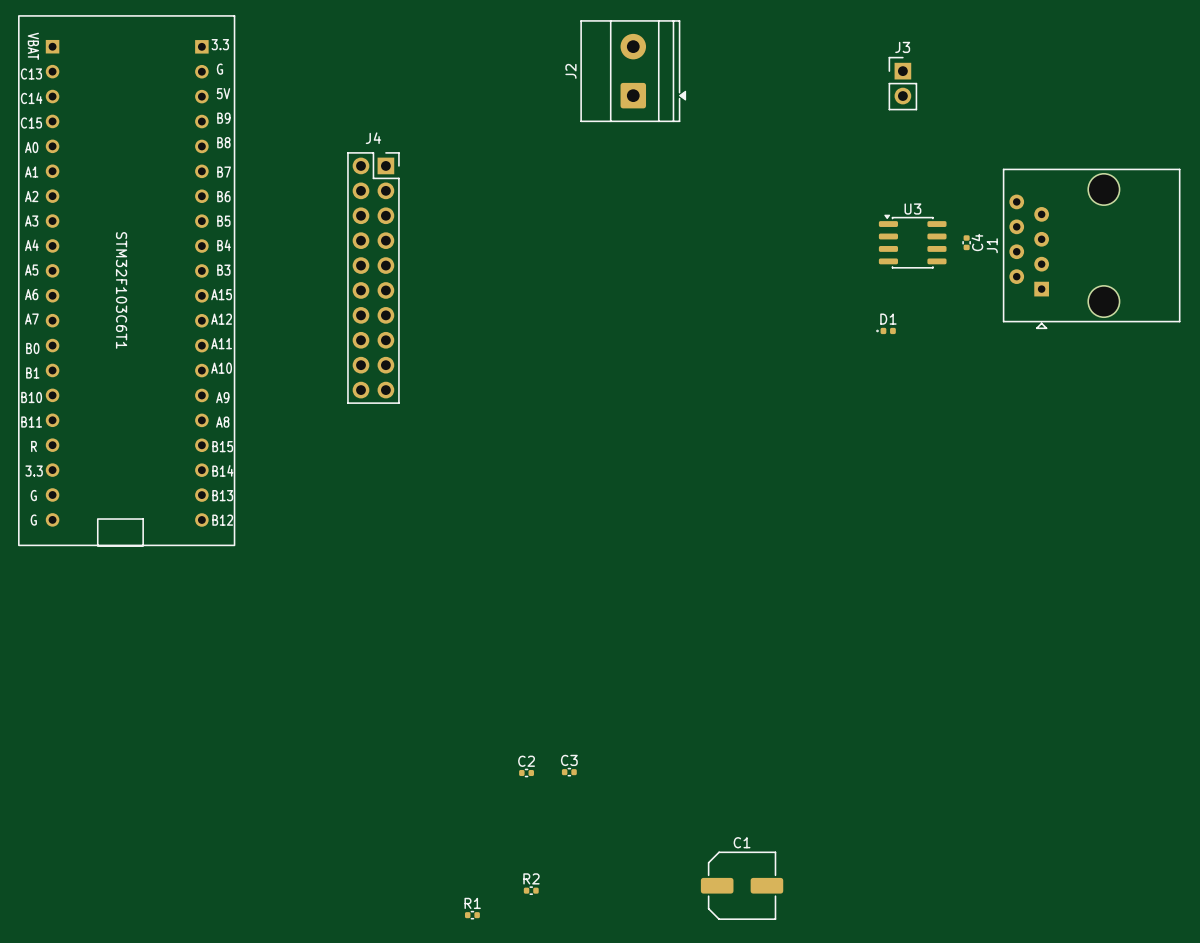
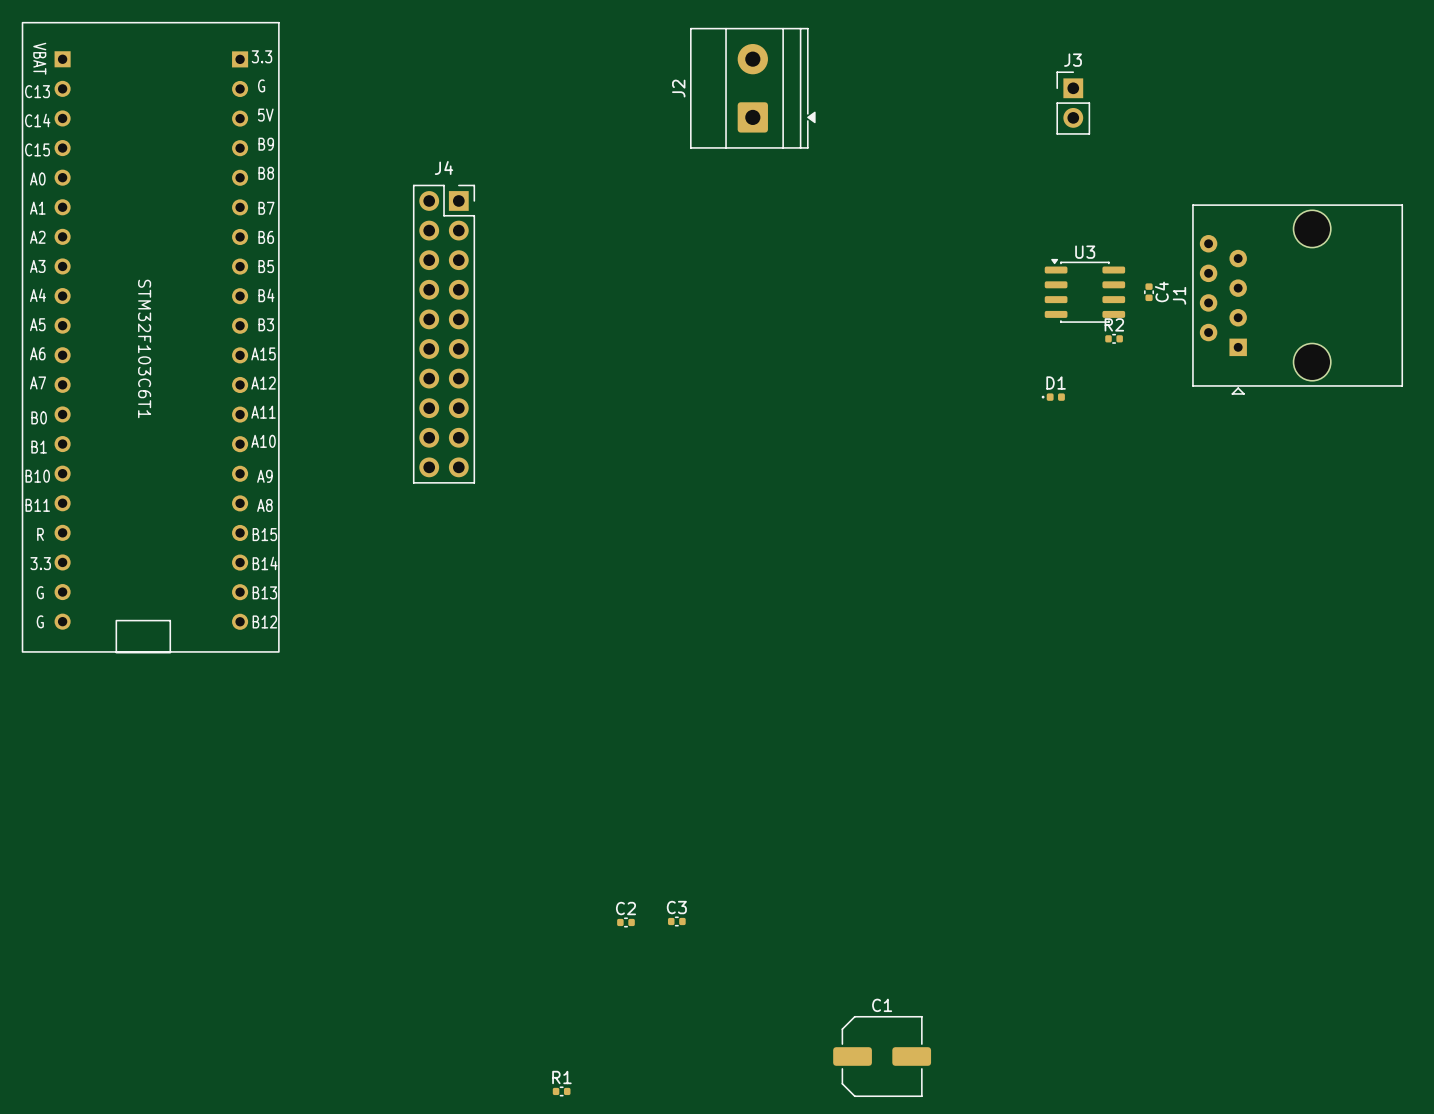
R2 position: (531, 890) -> (1114, 338)

